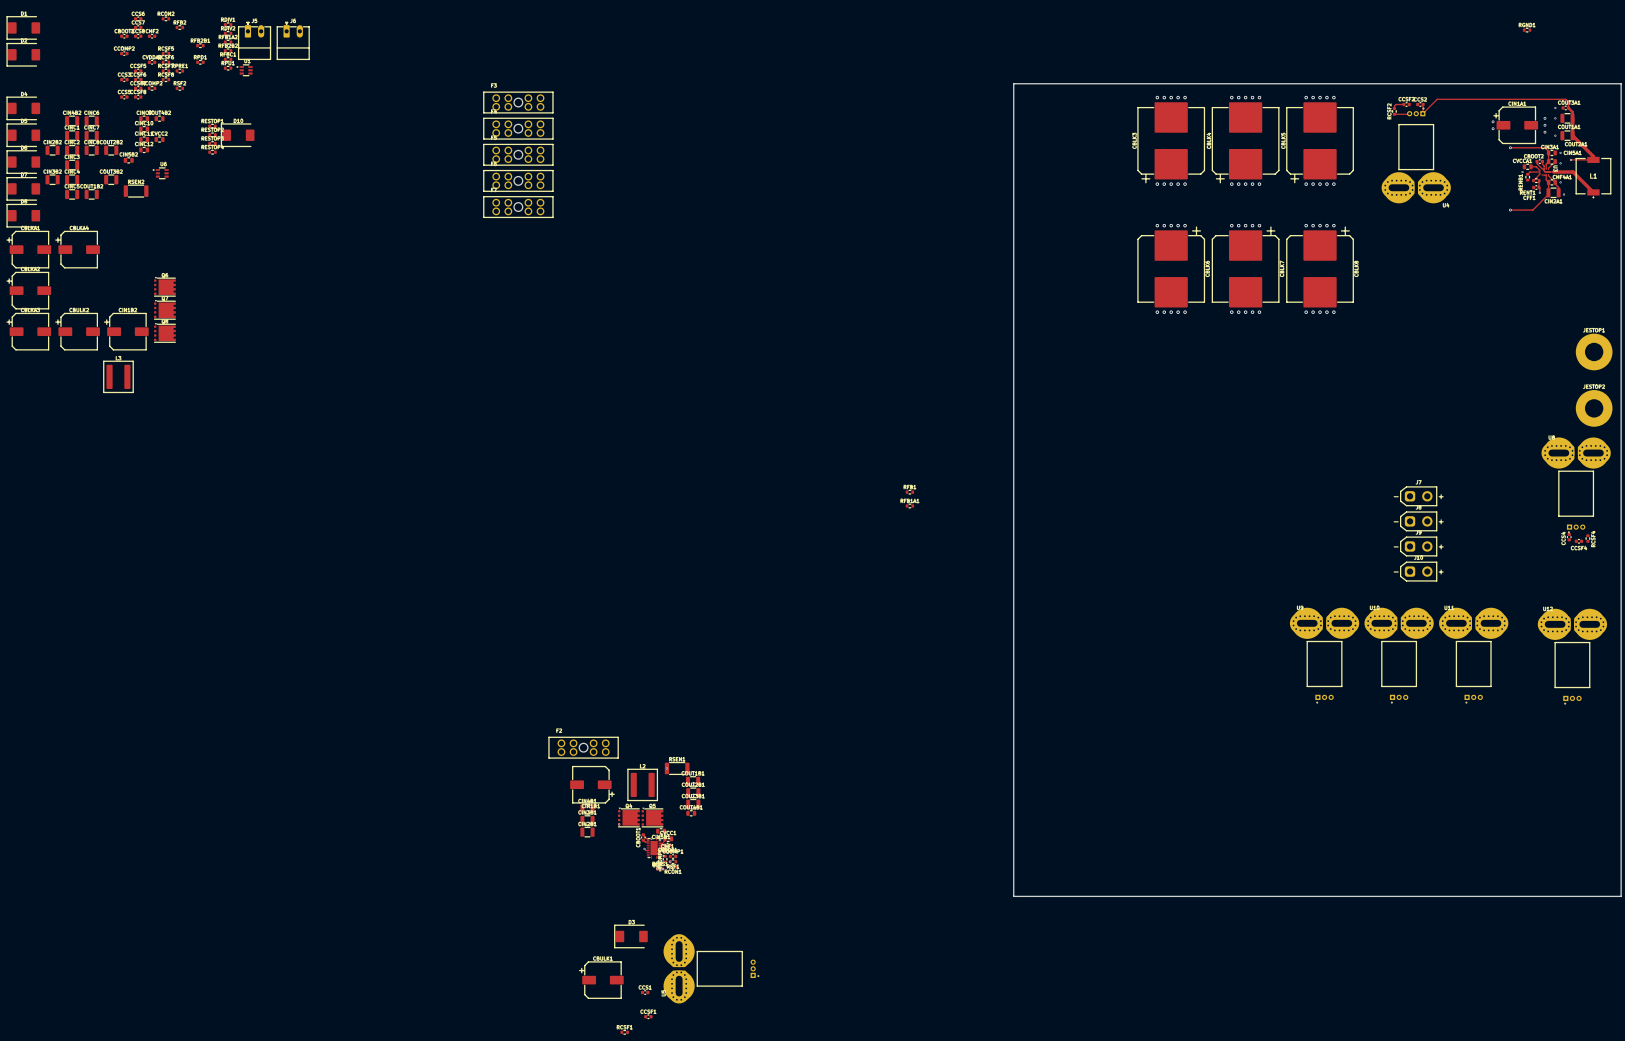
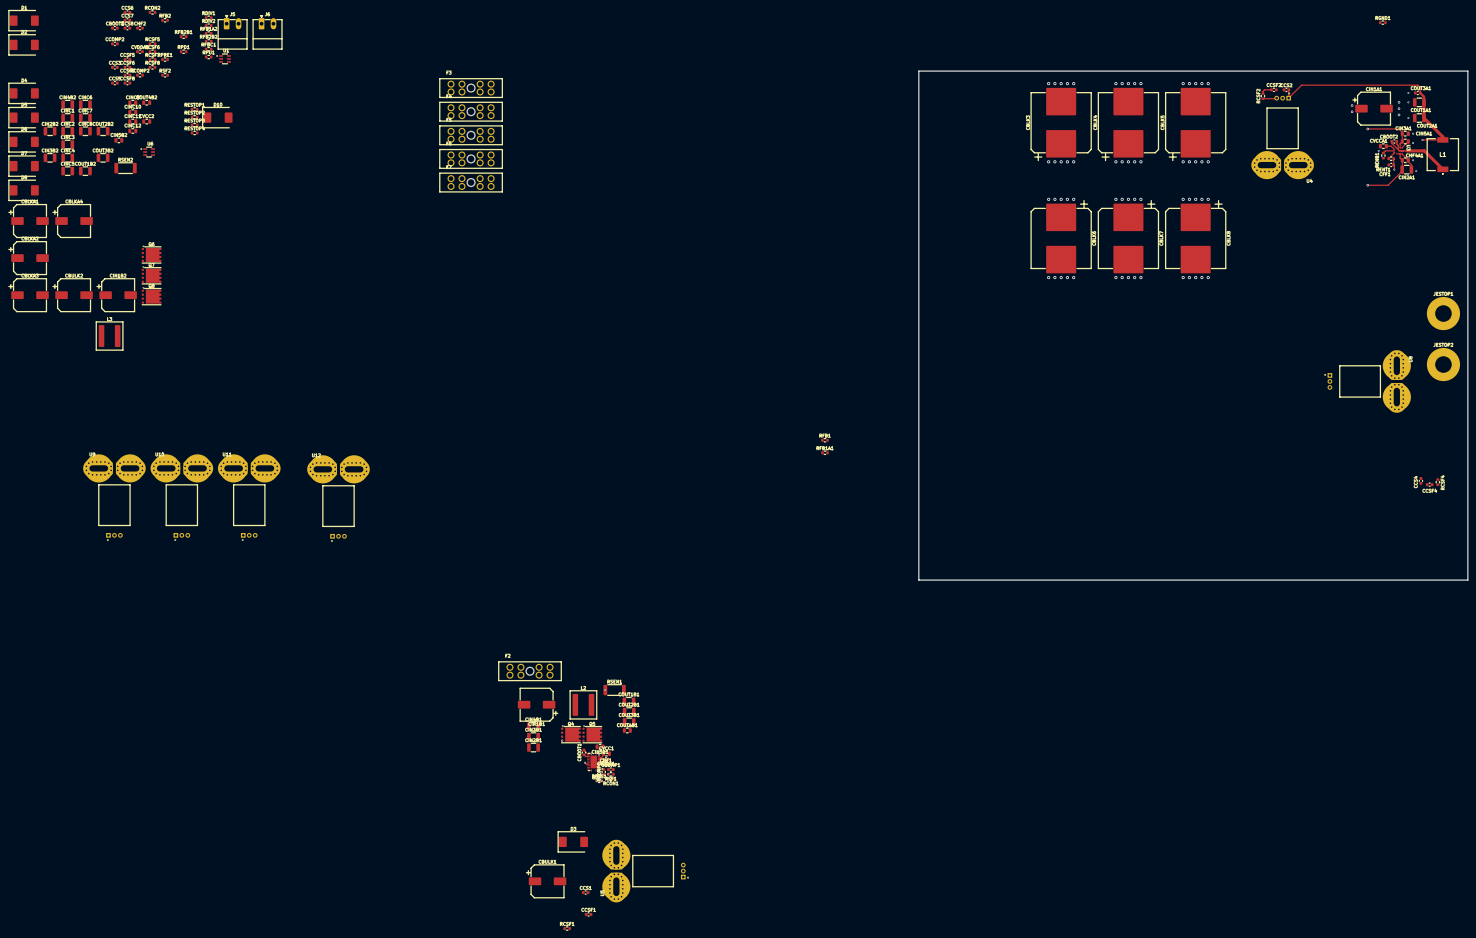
part rotation: 0° (1576, 485) -> 90° clockwise (1367, 381)
part position: (1576, 485) -> (1367, 381)
part: (1418, 496) -> none
part: (1418, 521) -> none
part: (1418, 546) -> none
part: (1418, 571) -> none
board edge: (1013, 646) (1013, 896) (1621, 896) (1621, 646) -> (918, 580) (1467, 580)
part position: (1324, 655) -> (114, 497)
part position: (1399, 655) -> (181, 497)
part position: (1473, 655) -> (249, 497)
part position: (1572, 656) -> (338, 498)

